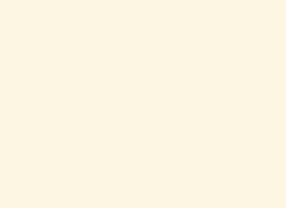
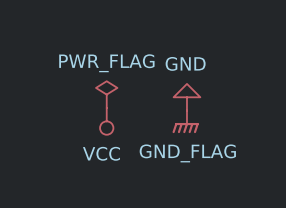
power symbol: none -> PWR_FLAG (106, 94)
power symbol: none -> GND (186, 97)
power symbol: none -> VCC (106, 121)
power symbol: none -> GND_FLAG (185, 121)

